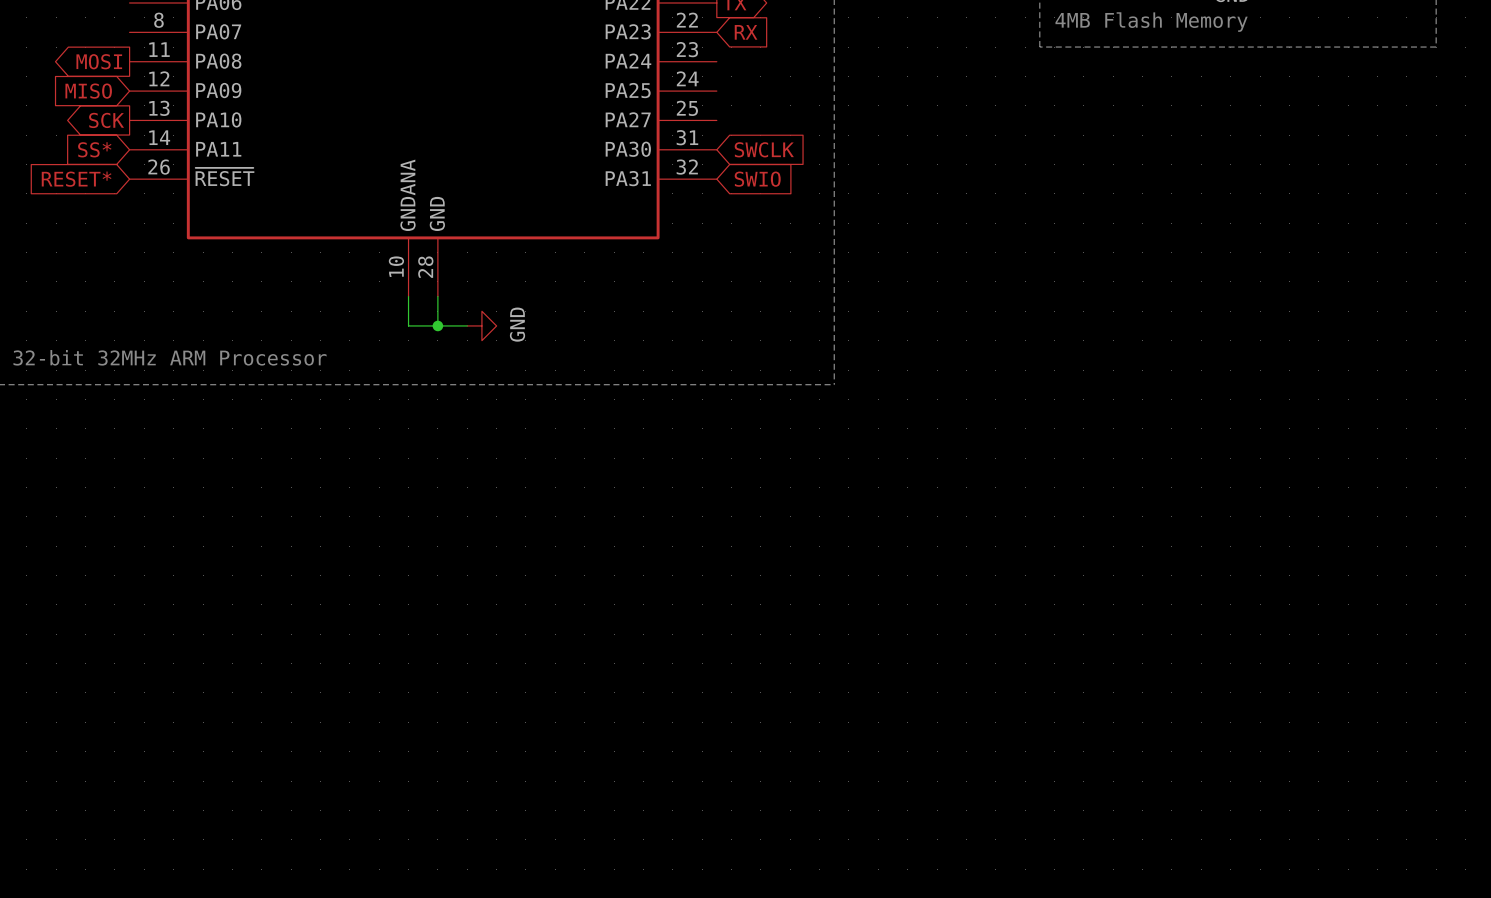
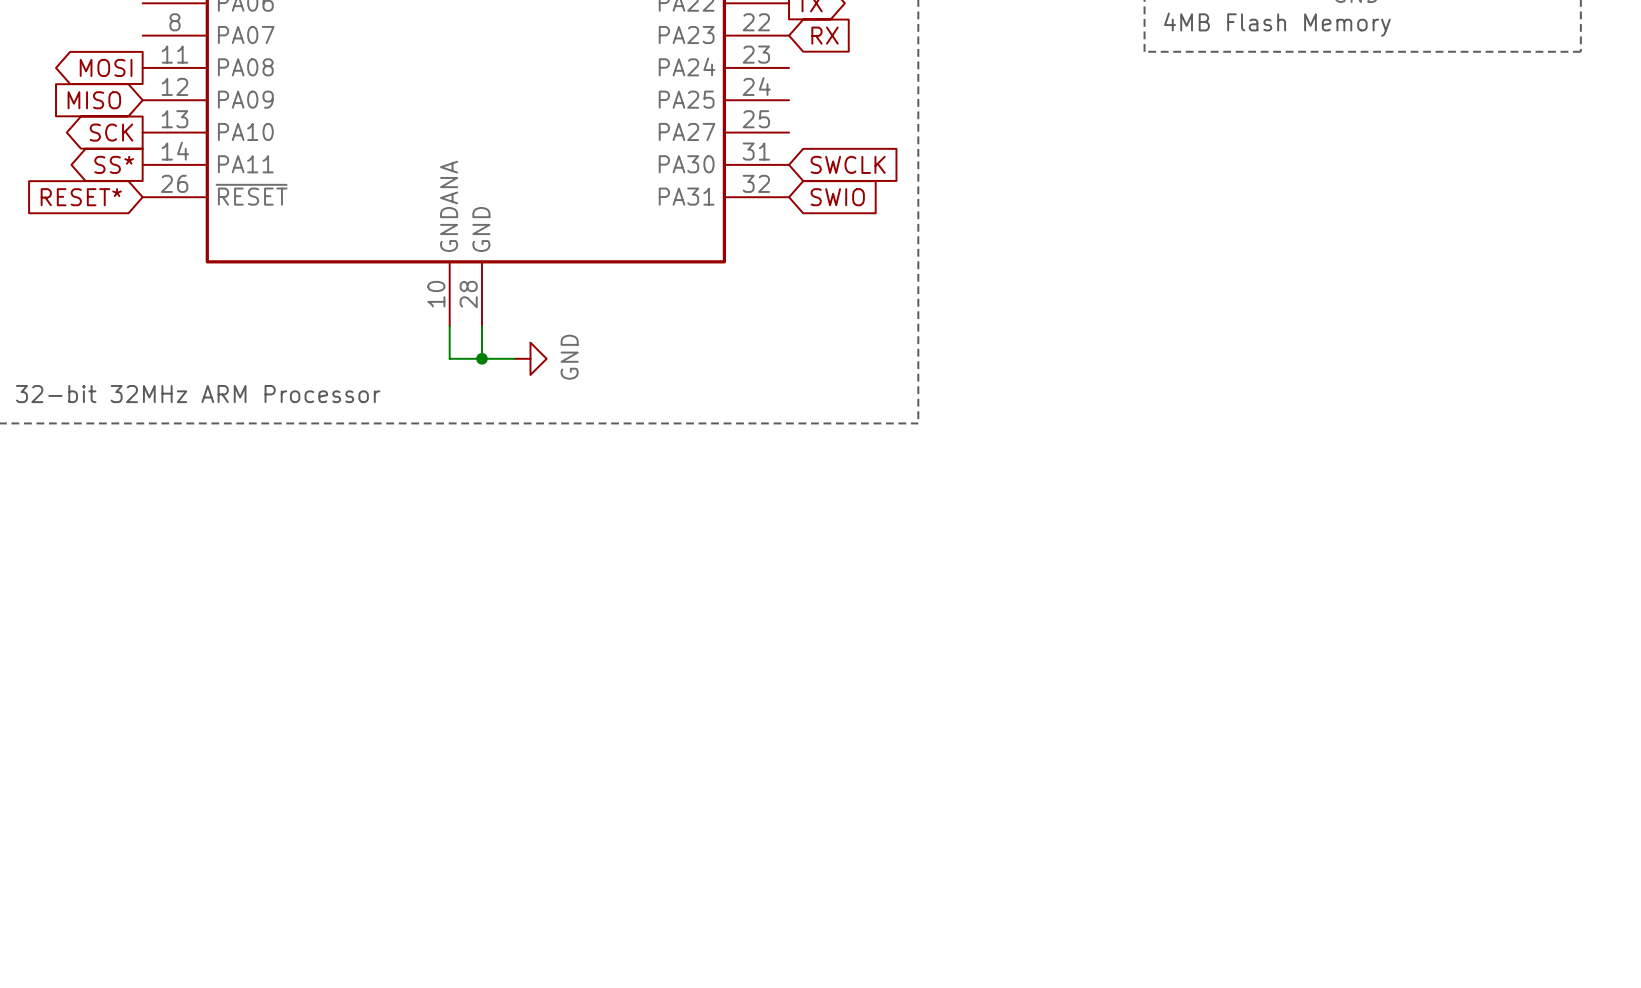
global label shape: input (94, 149) -> output (114, 164)

